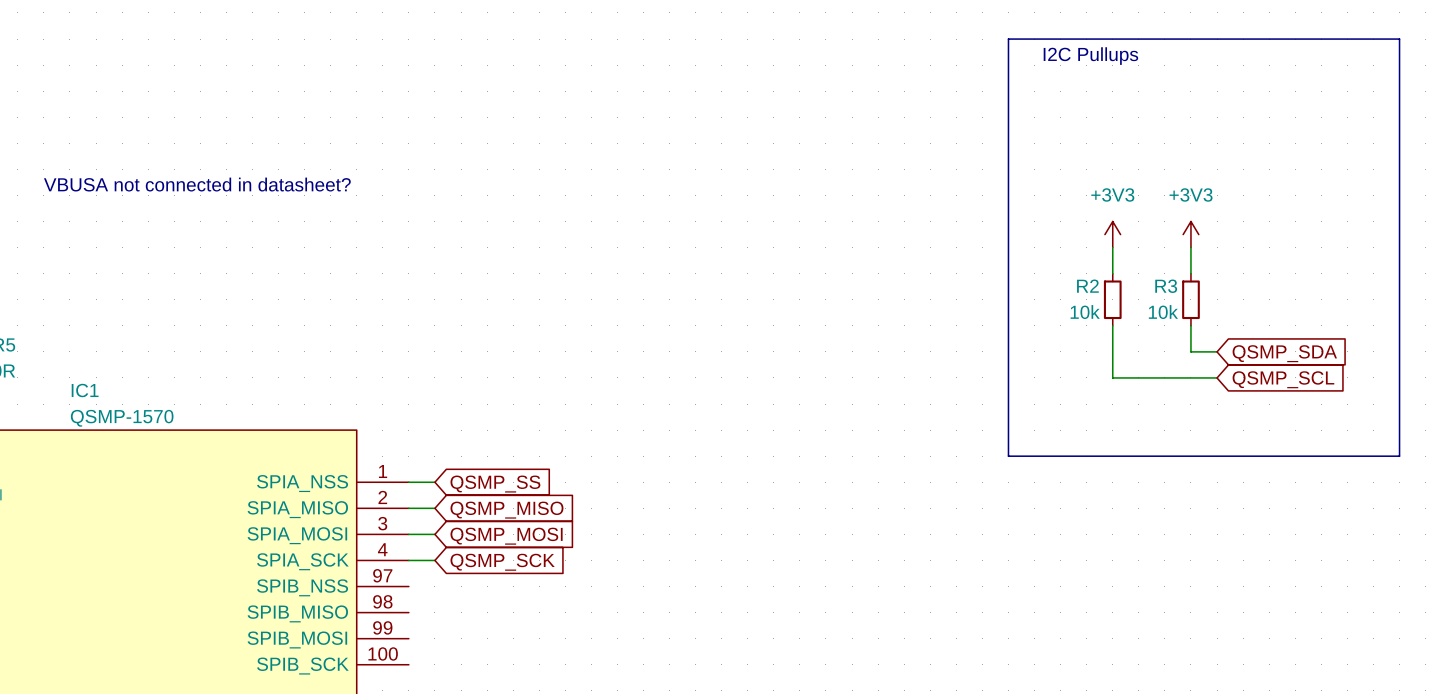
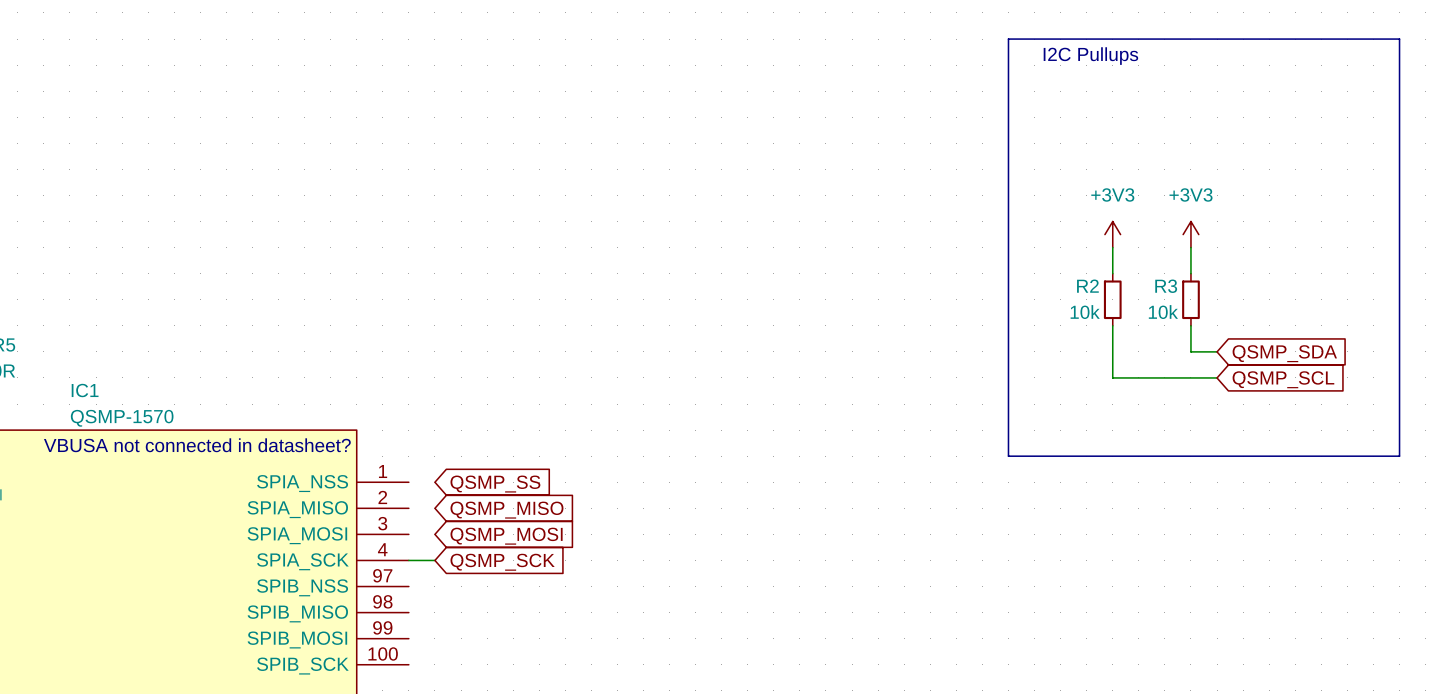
text: VBUSA not connected in datasheet? (197, 184) -> none
text: none -> VBUSA not connected in datasheet? (197, 445)
wire: (408, 482) (434, 482) -> none
wire: (408, 508) (434, 508) -> none
wire: (408, 534) (434, 534) -> none

